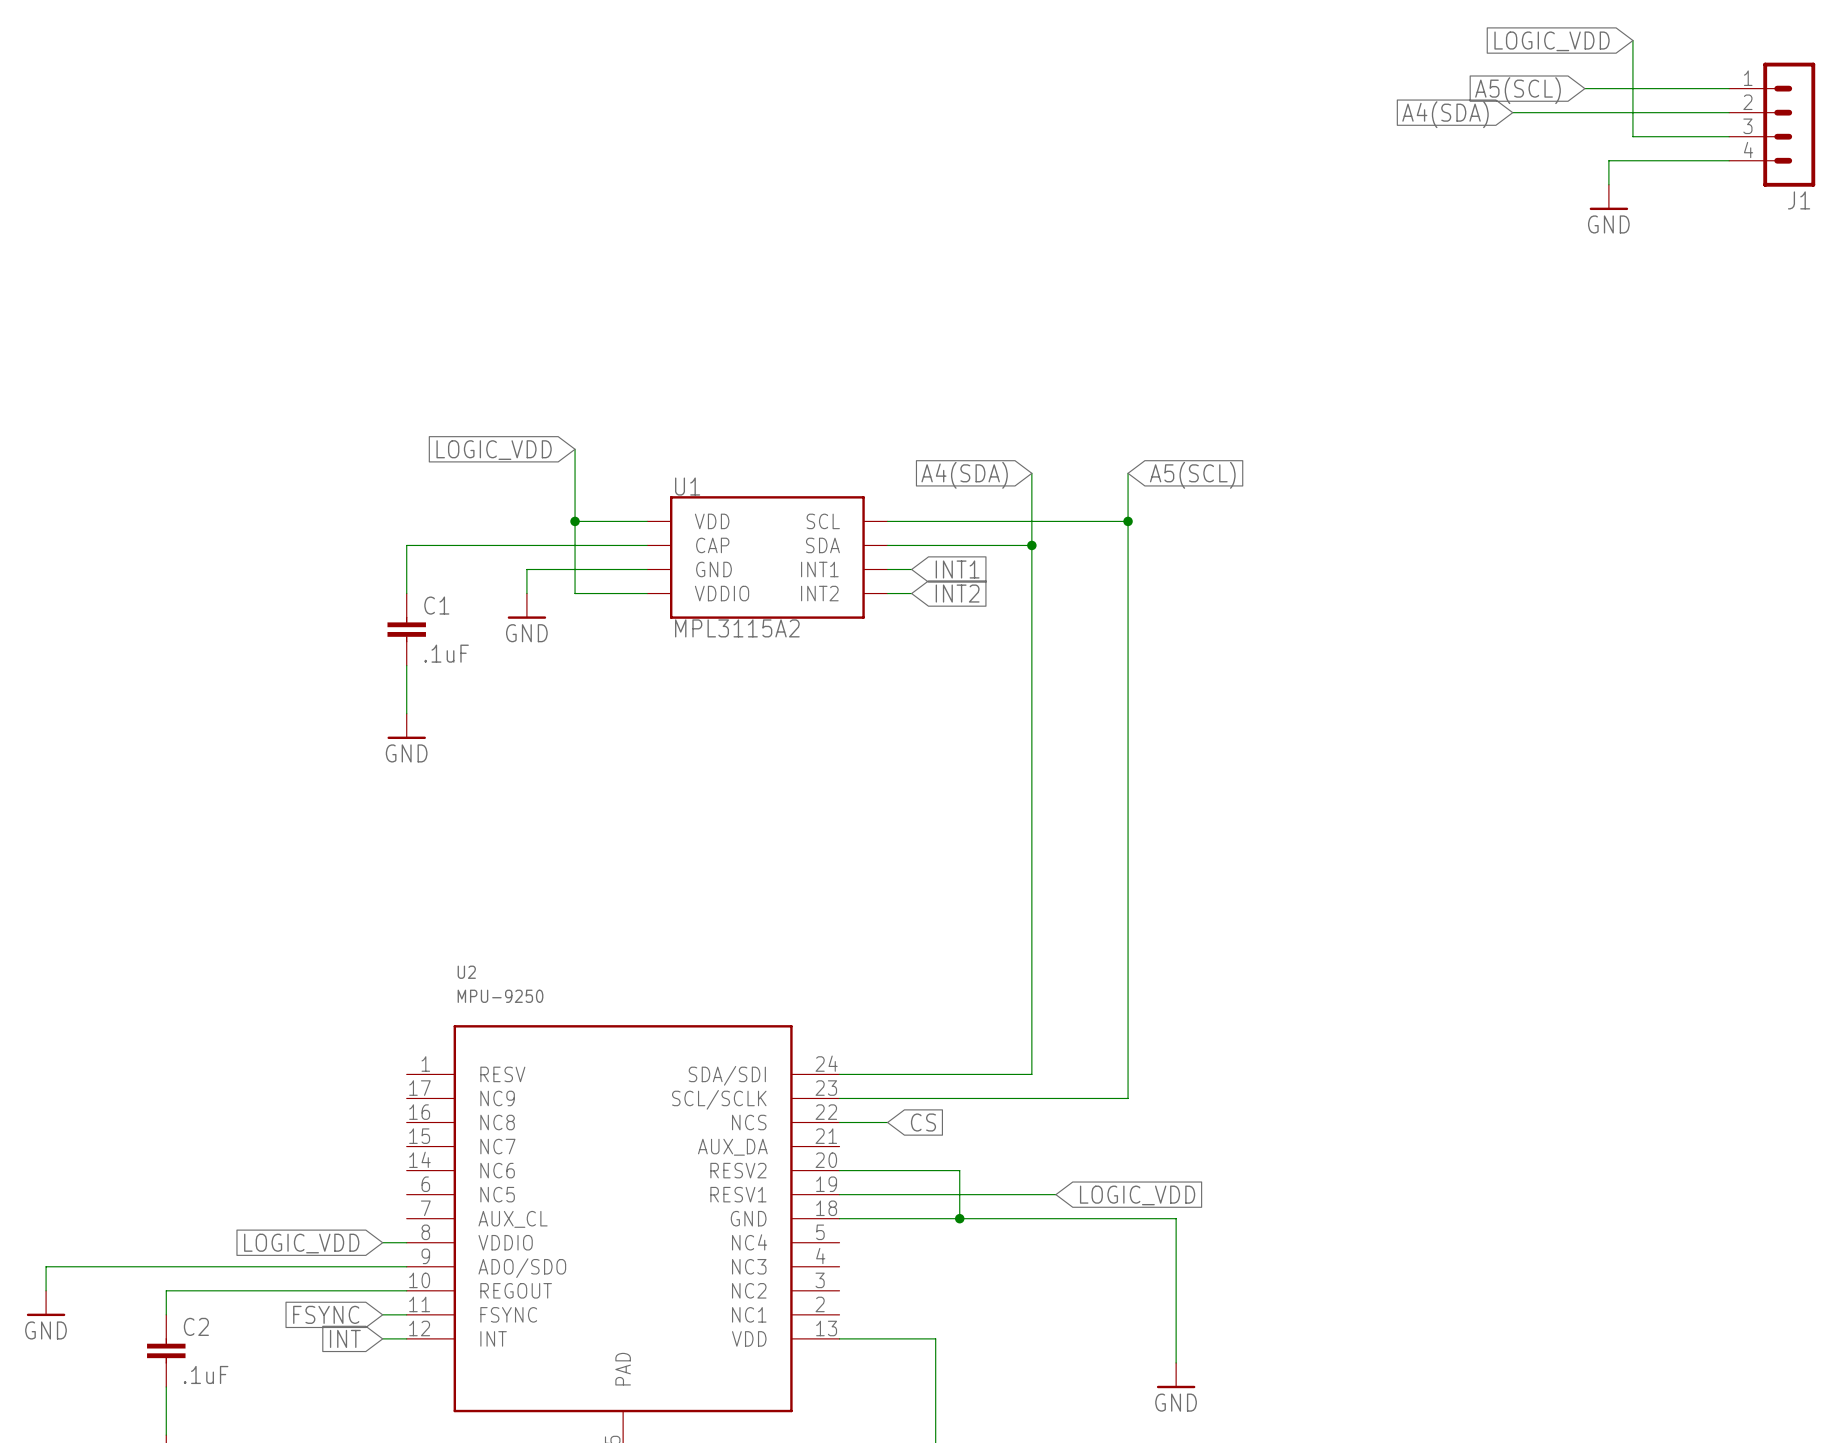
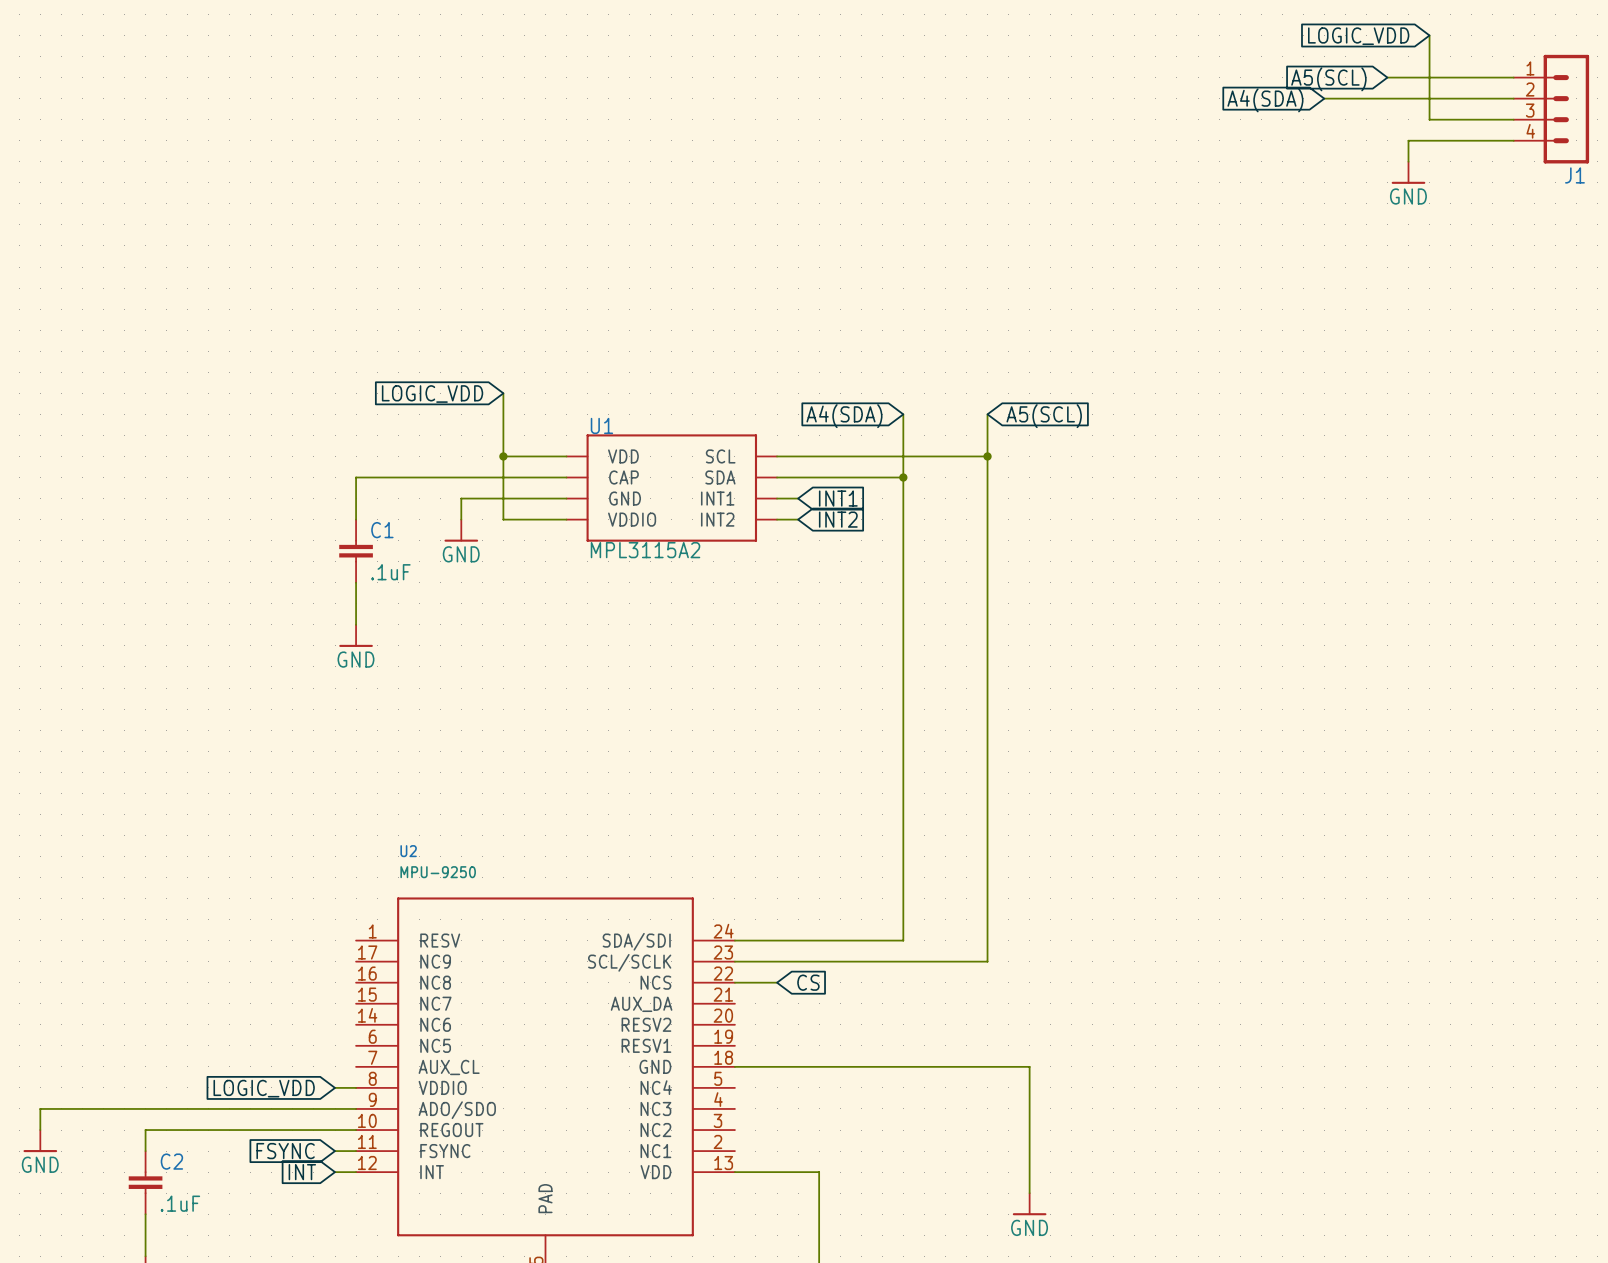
wire: (839, 1170) (959, 1170) (959, 1218) -> none
wire: (839, 1194) (1055, 1194) -> none
global label: LOGIC_VDD (1137, 1195) -> none
junction: (959, 1218) -> none

